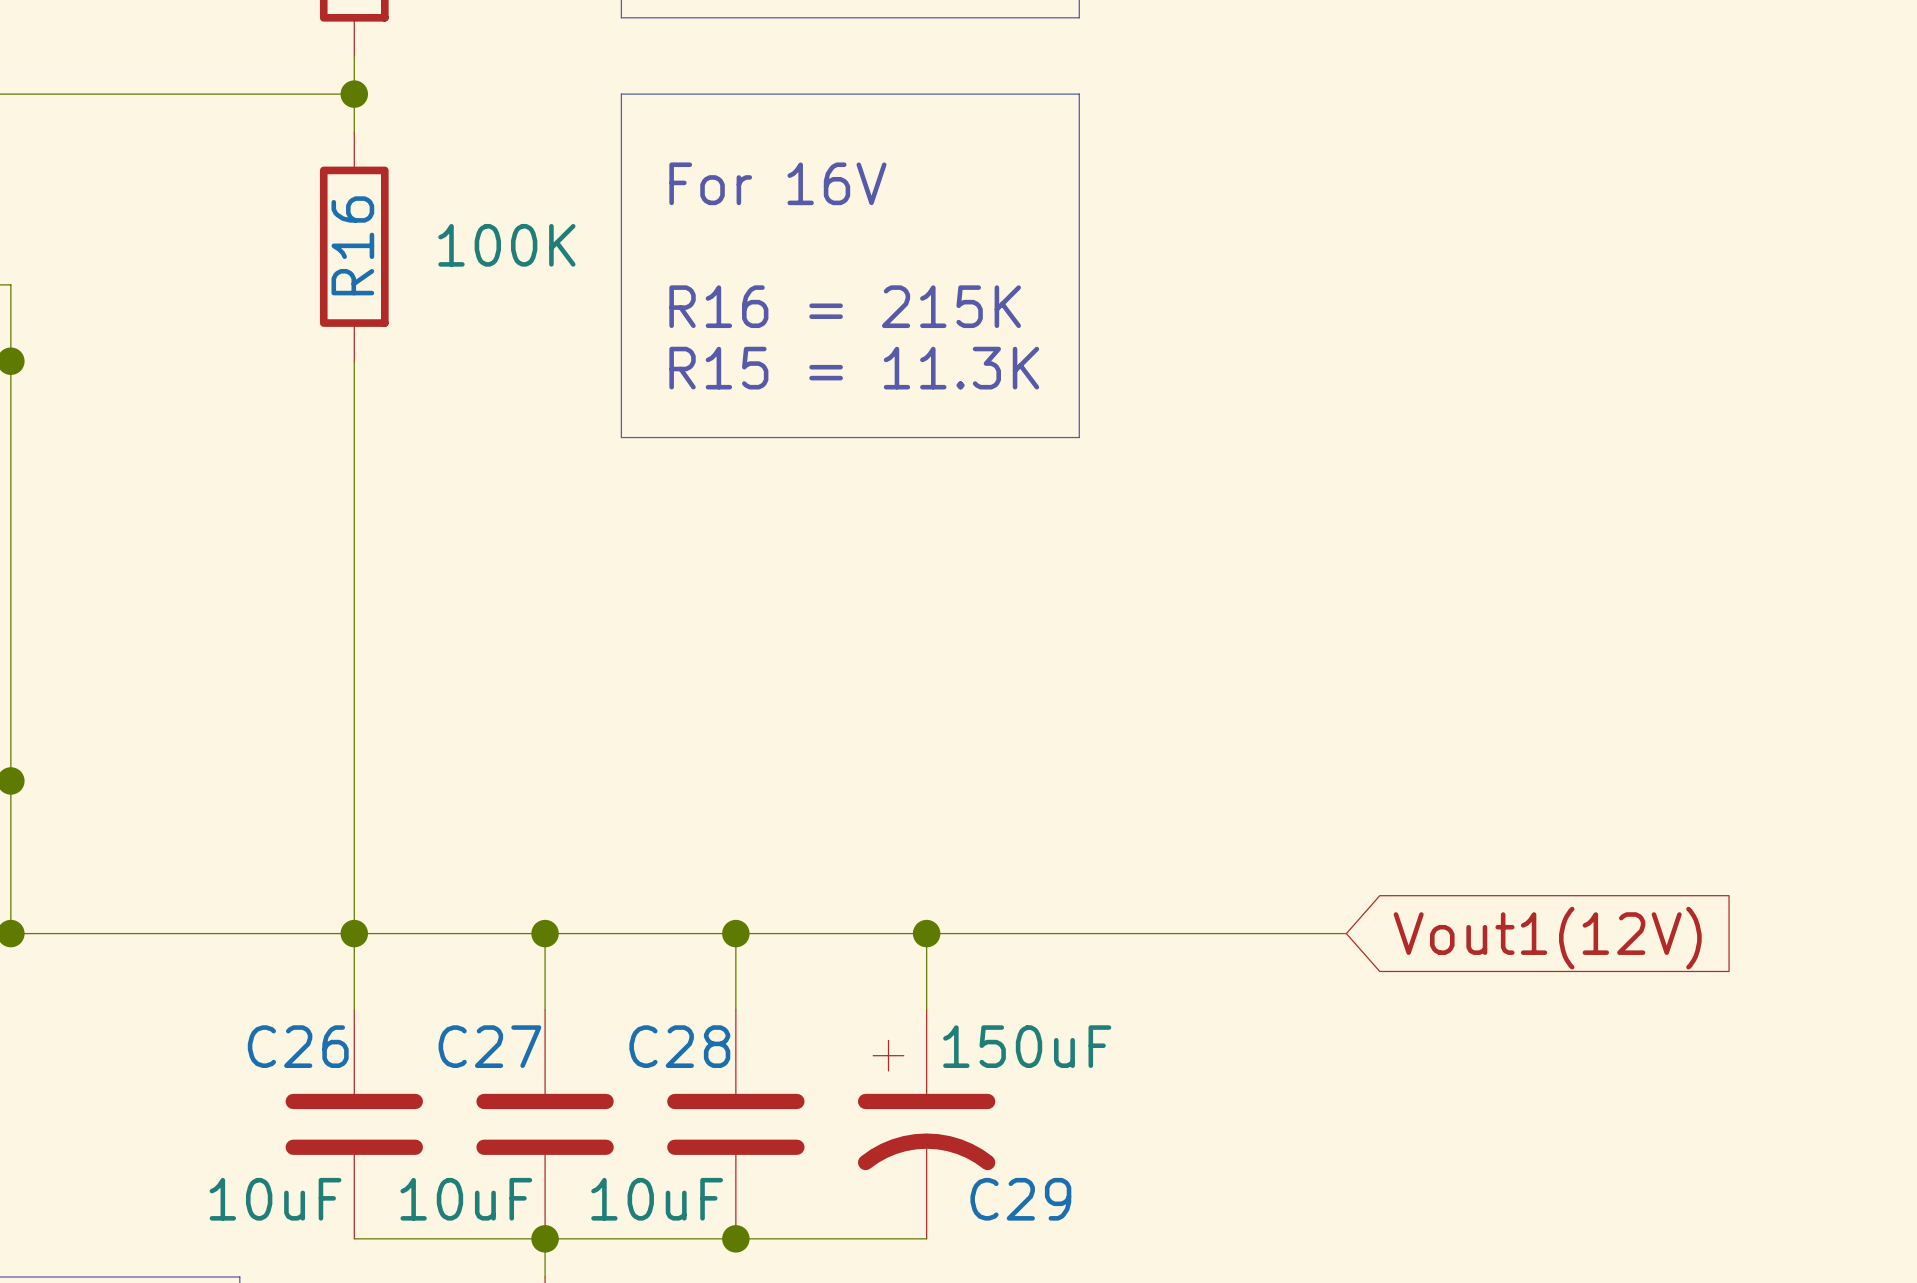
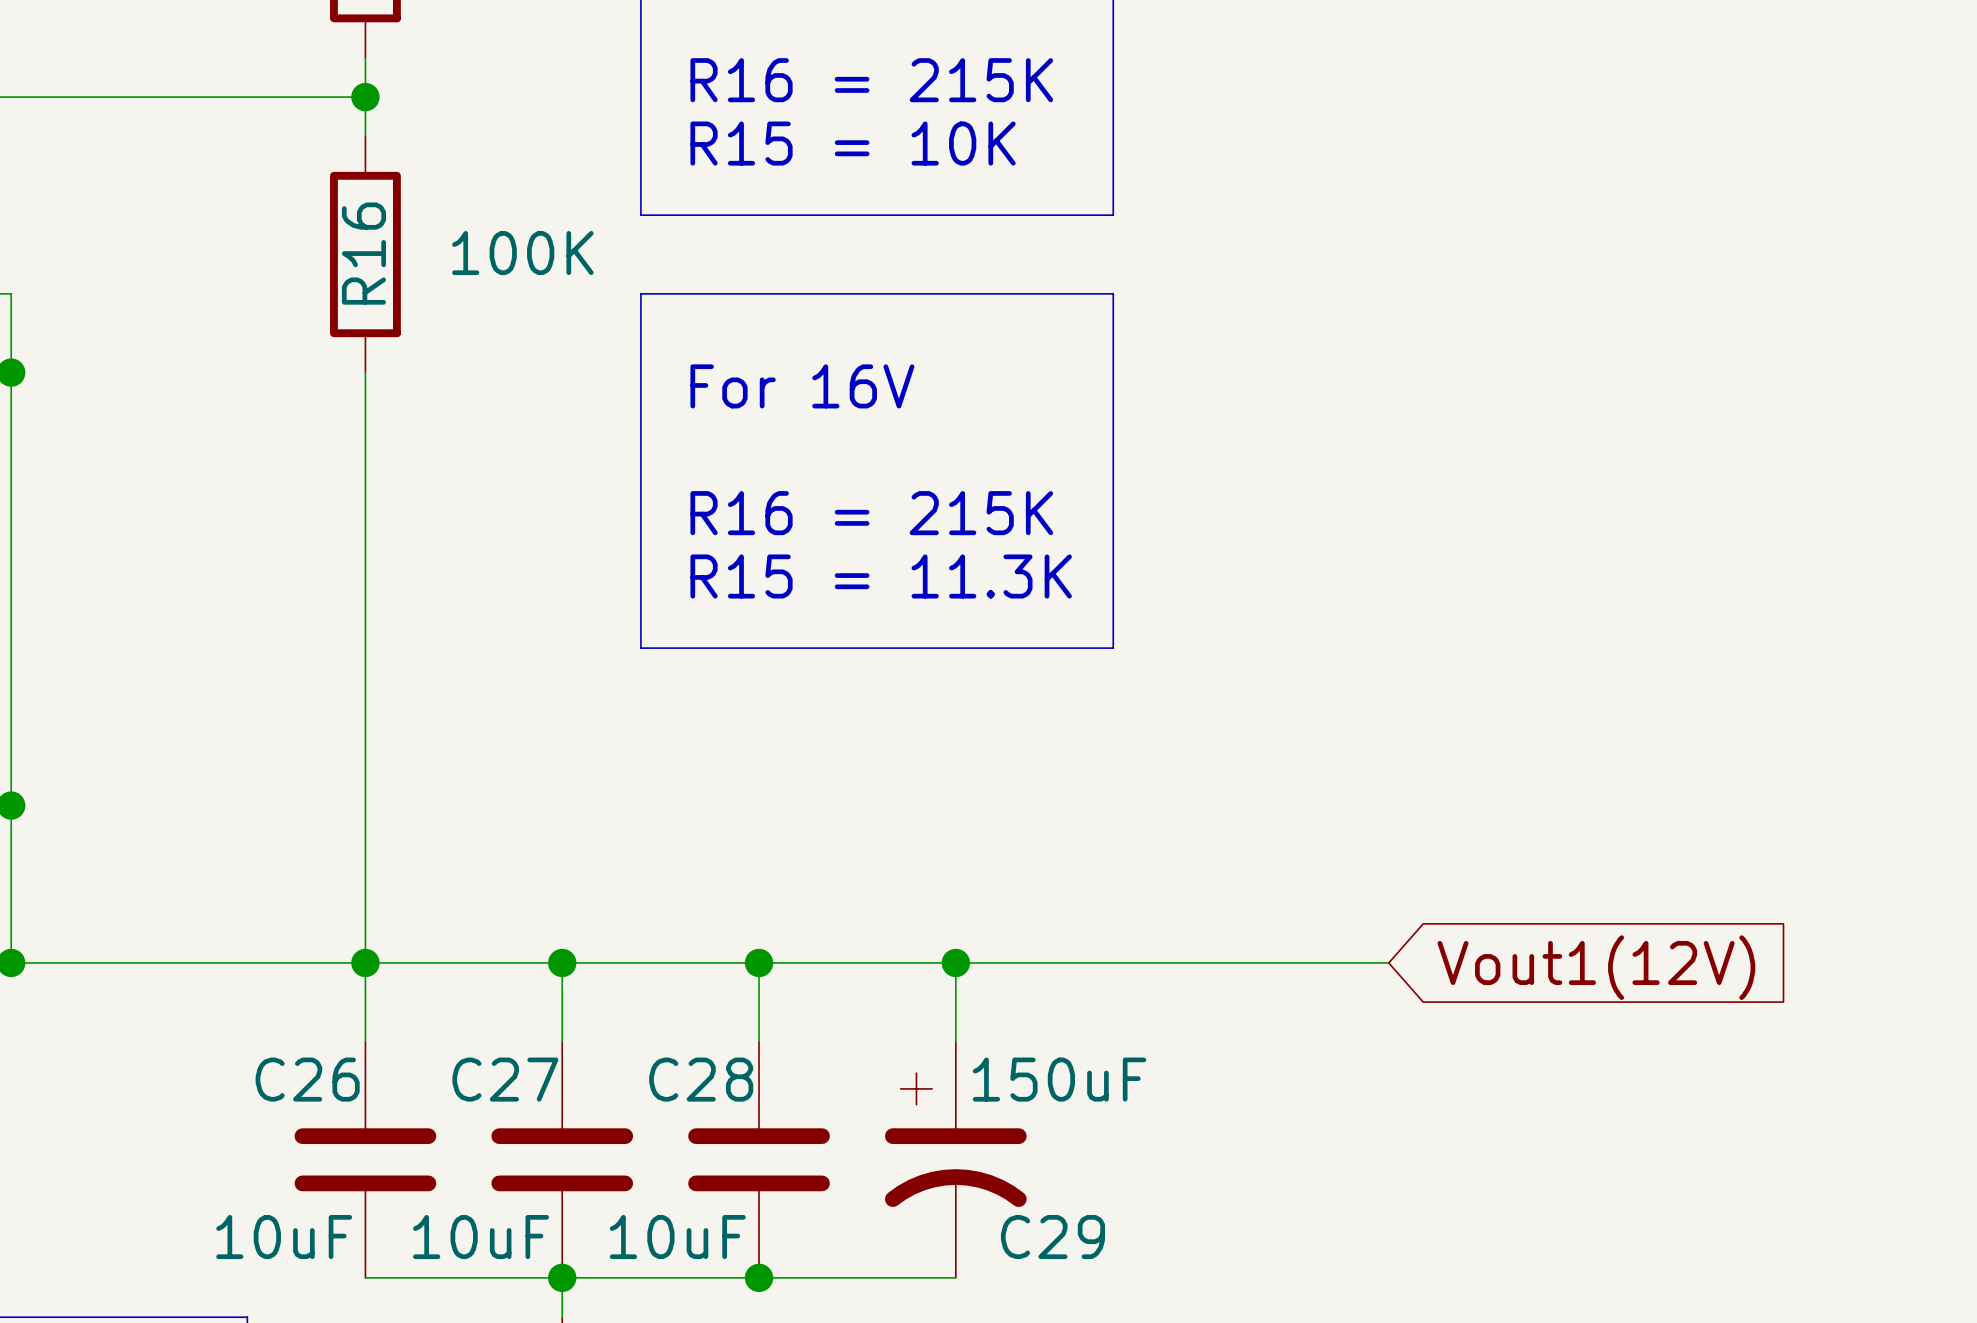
line: (621, 17) (1079, 17) -> (640, 18) (640, 97)
text: none -> R16 = 215K (871, 80)
line: (621, 94) (1079, 94) -> (1113, 18) (1113, 97)
text: none -> R15 = 10K (853, 143)
text: For 16V (777, 183) -> none
line: (621, 208) (621, 284) -> (640, 215) (1113, 215)
line: (1079, 208) (1079, 284) -> (640, 293) (1113, 293)
text: R16 = 215K (845, 306) -> none
text: R15 = 11.3K (854, 368) -> For 16V (802, 386)
line: (621, 437) (1079, 437) -> (640, 451) (640, 648) (1113, 648) (1113, 451)
text: none -> R16 = 215K (871, 513)
text: none -> R15 = 11.3K (881, 576)

